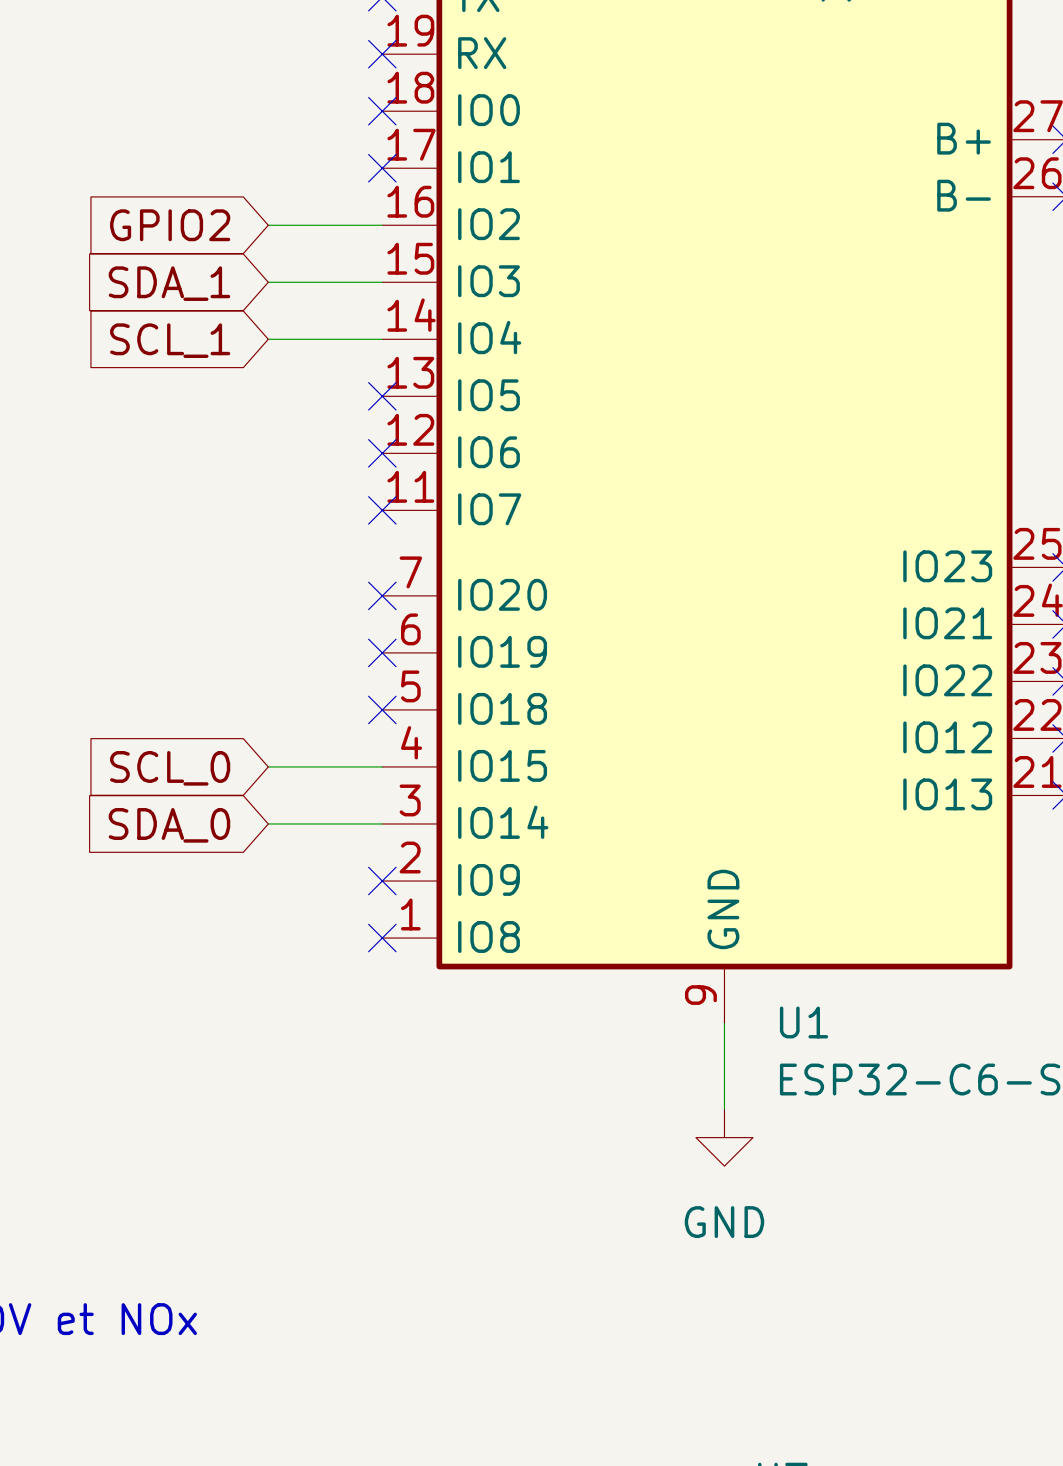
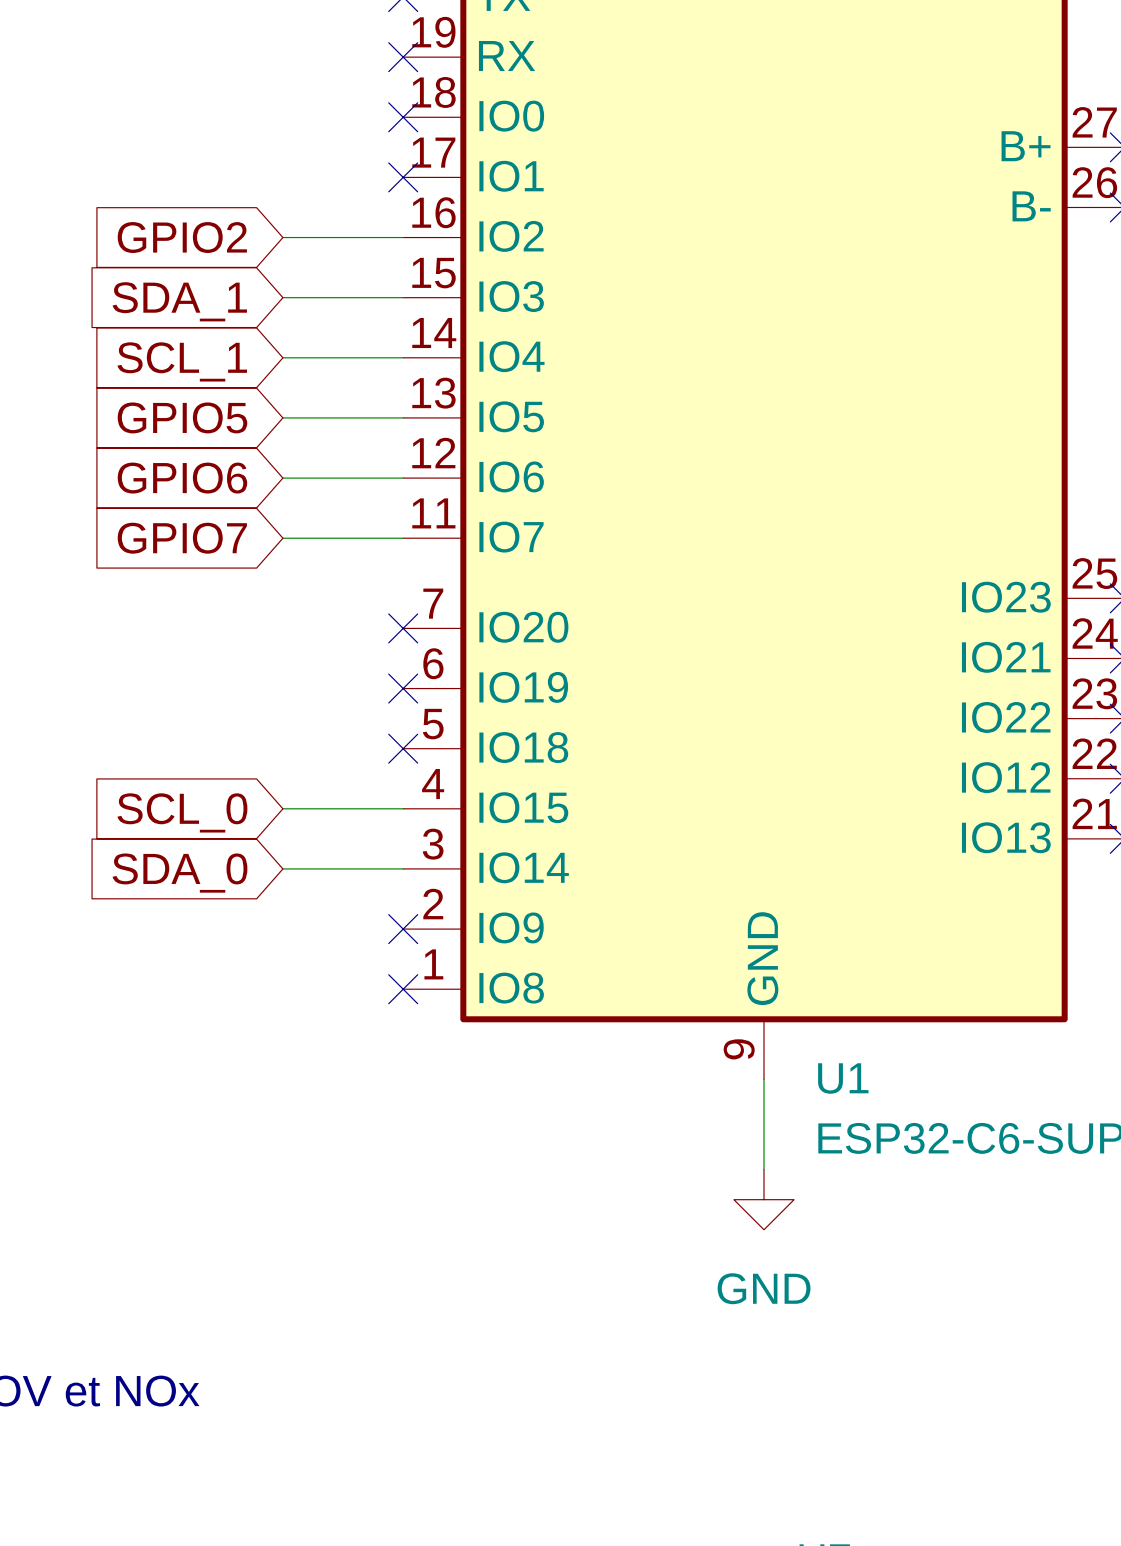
global label: none -> GPIO5 (182, 417)
wire: none -> (282, 417) (403, 417)
no-connect mark: (382, 396) -> none
global label: none -> GPIO6 (182, 478)
wire: none -> (282, 478) (403, 478)
no-connect mark: (382, 453) -> none
global label: none -> GPIO7 (182, 538)
wire: none -> (282, 538) (403, 538)
no-connect mark: (382, 510) -> none

